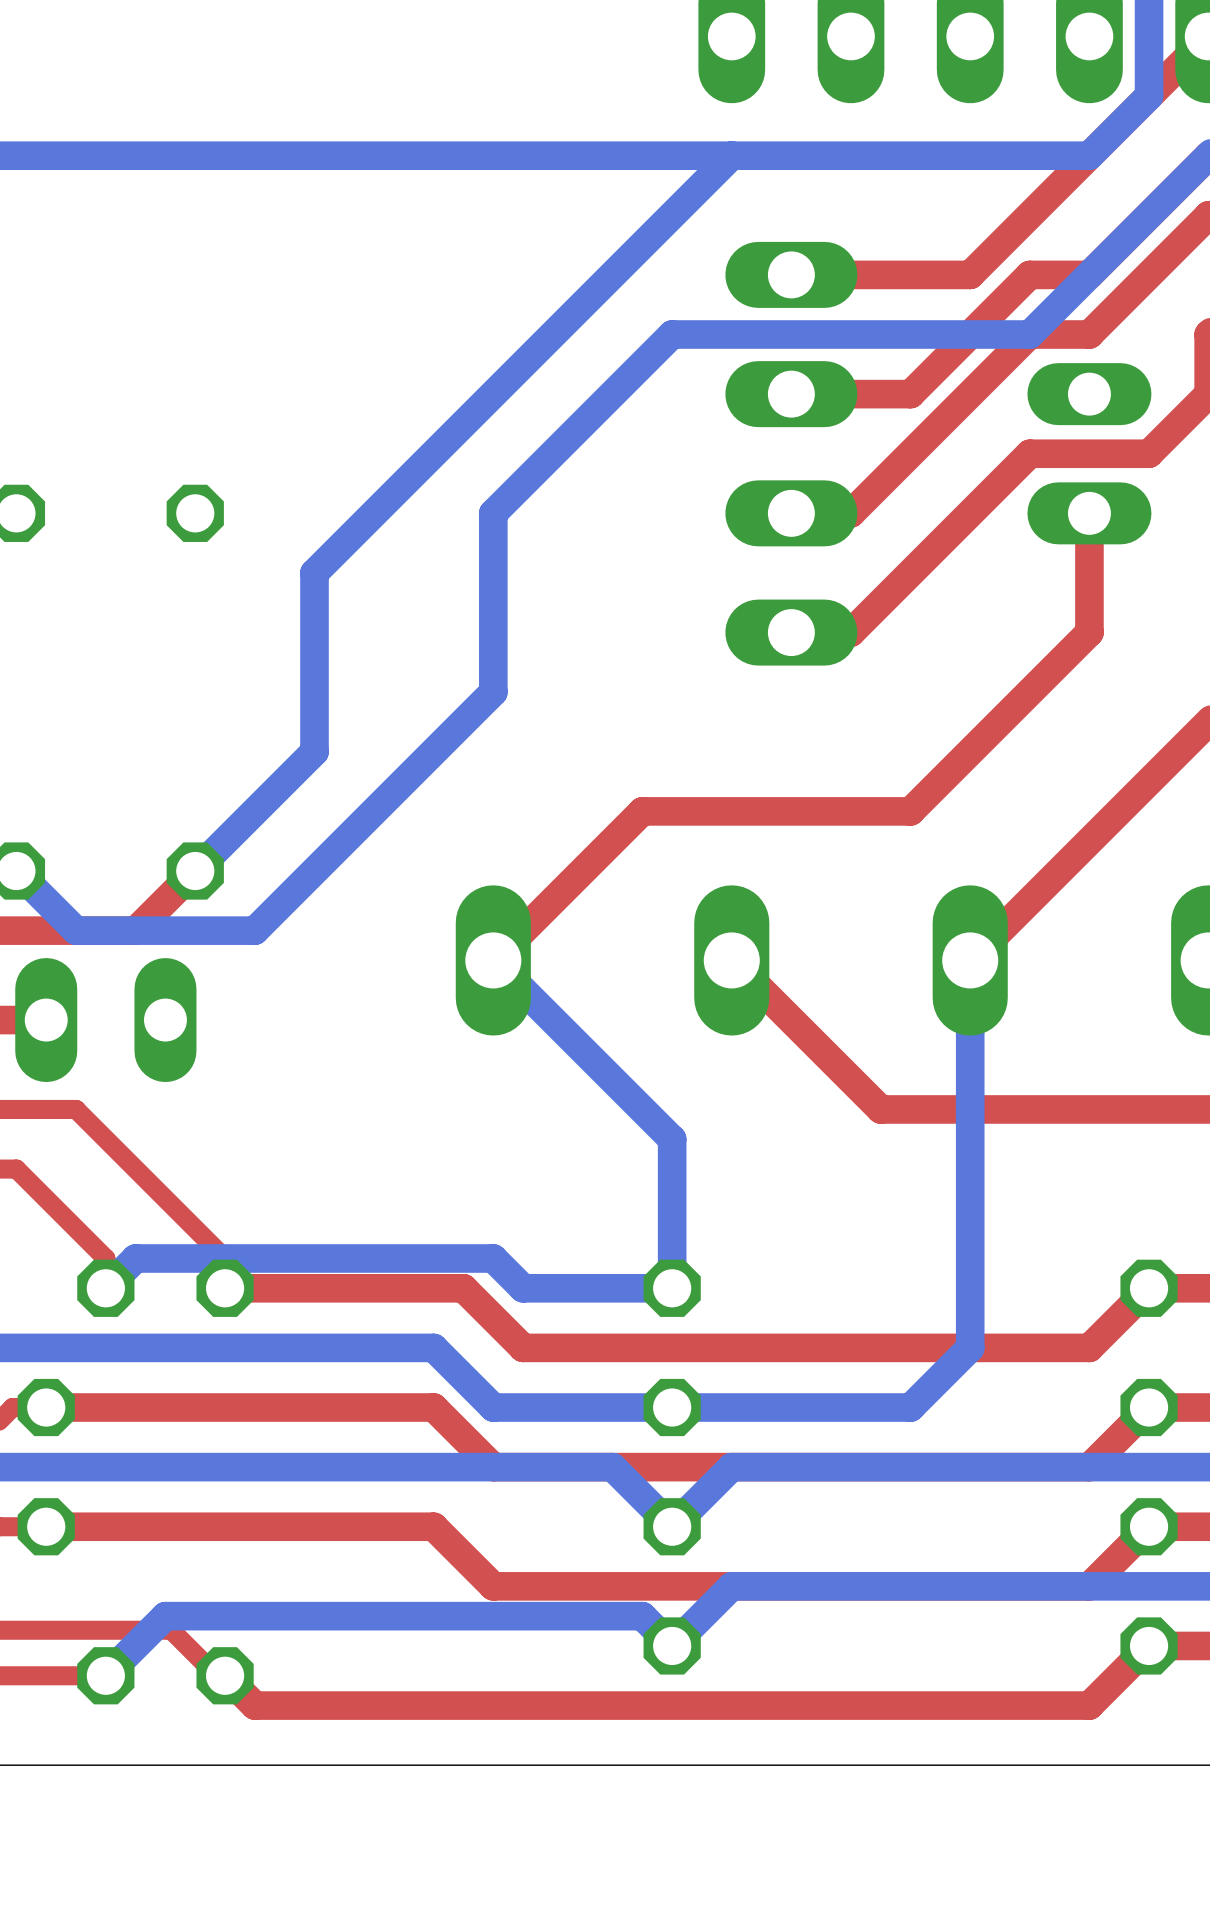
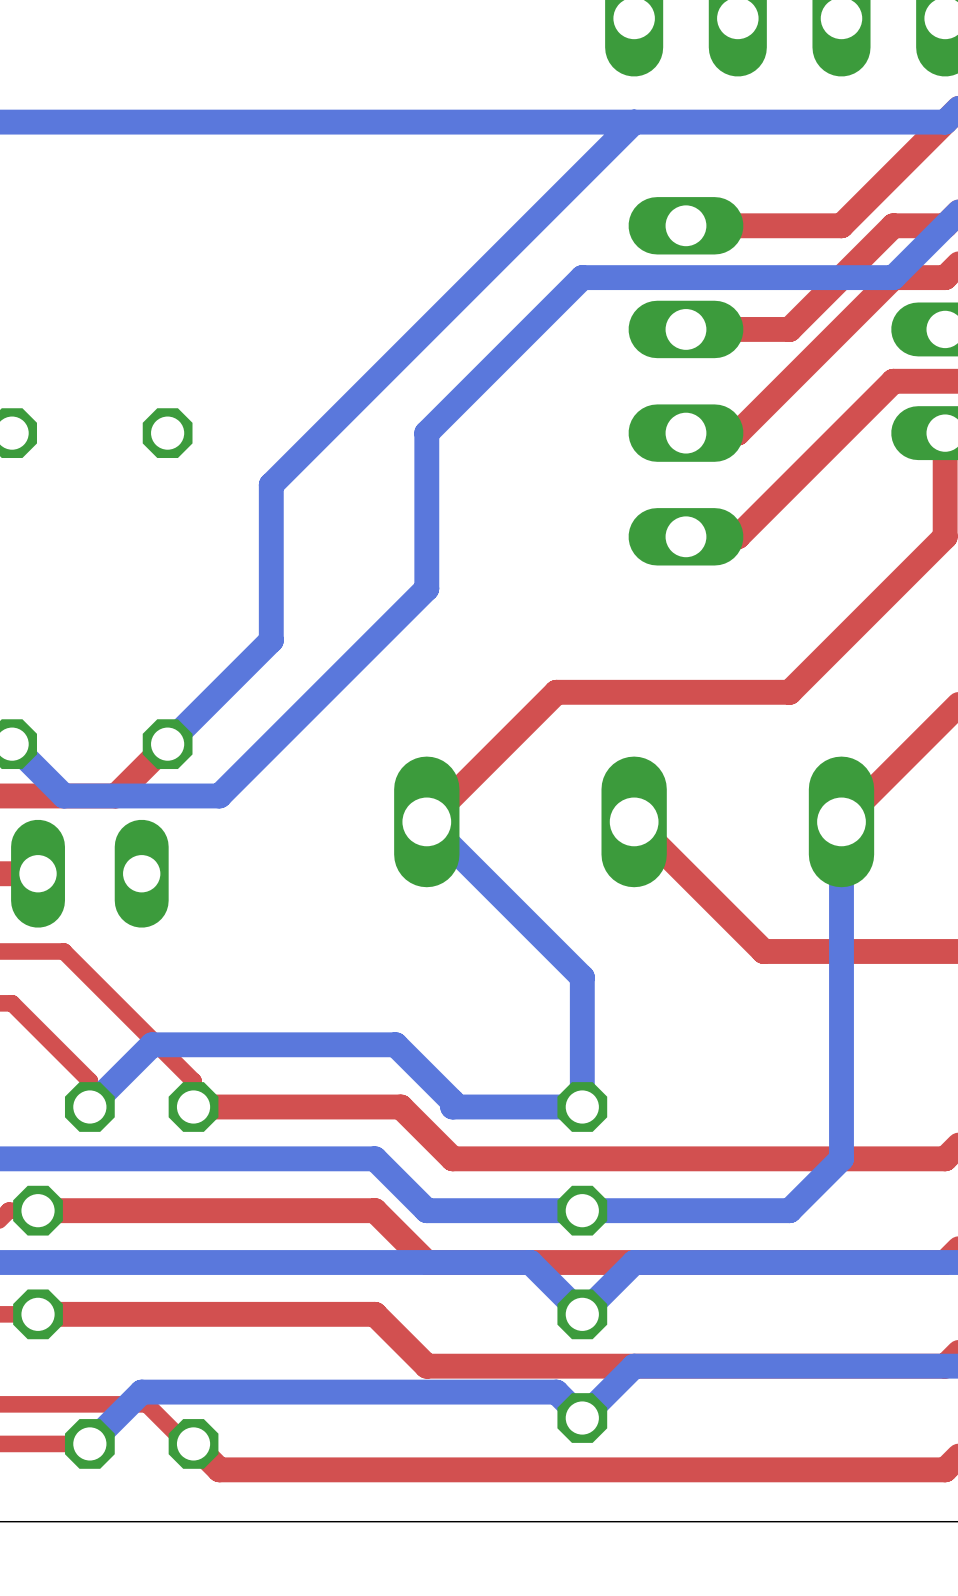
bottom track: (135, 1258) (493, 1258) (523, 1288) -> (115, 1081) (152, 1044) (395, 1044) (452, 1101) (452, 1107)

